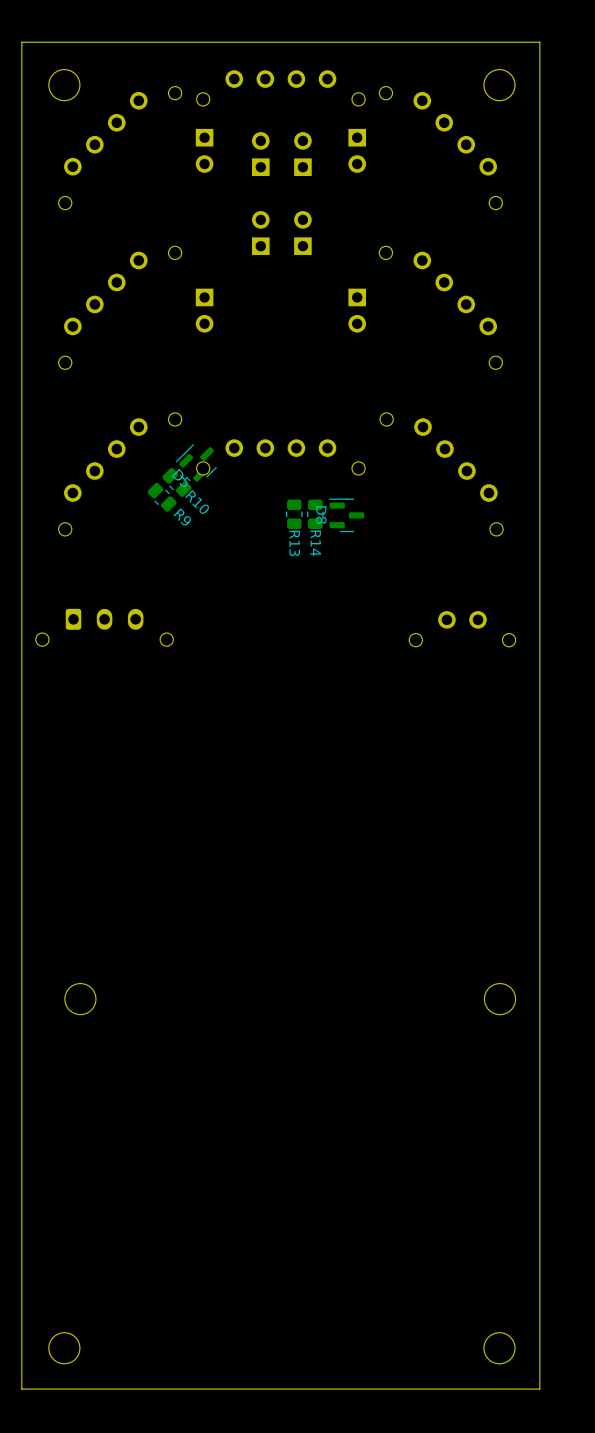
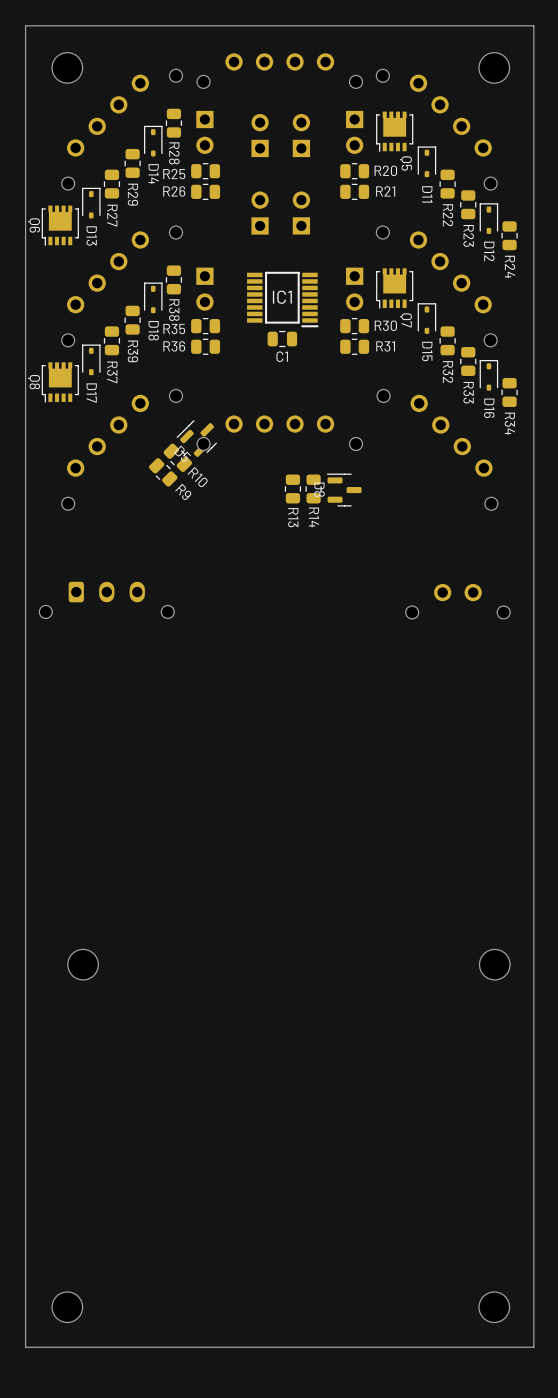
R28: none -> (173, 123)
Q5: none -> (394, 131)
D14: none -> (153, 141)
D11: none -> (426, 161)
R29: none -> (132, 163)
R25: none -> (205, 171)
R20: none -> (354, 171)
R27: none -> (111, 184)
R22: none -> (447, 184)
R26: none -> (205, 191)
R21: none -> (354, 191)
D13: none -> (91, 203)
R23: none -> (468, 204)
D12: none -> (488, 218)
Q6: none -> (60, 225)
R24: none -> (509, 235)
R38: none -> (173, 279)
Q7: none -> (394, 288)
D18: none -> (153, 297)
IC1: none -> (282, 299)
D15: none -> (426, 318)
R39: none -> (132, 320)
R35: none -> (205, 326)
R30: none -> (354, 326)
C1: none -> (282, 339)
R37: none -> (111, 340)
R32: none -> (447, 340)
R36: none -> (205, 346)
R31: none -> (354, 346)
D17: none -> (91, 359)
R33: none -> (468, 361)
D16: none -> (488, 375)
Q8: none -> (60, 382)
R34: none -> (509, 392)

